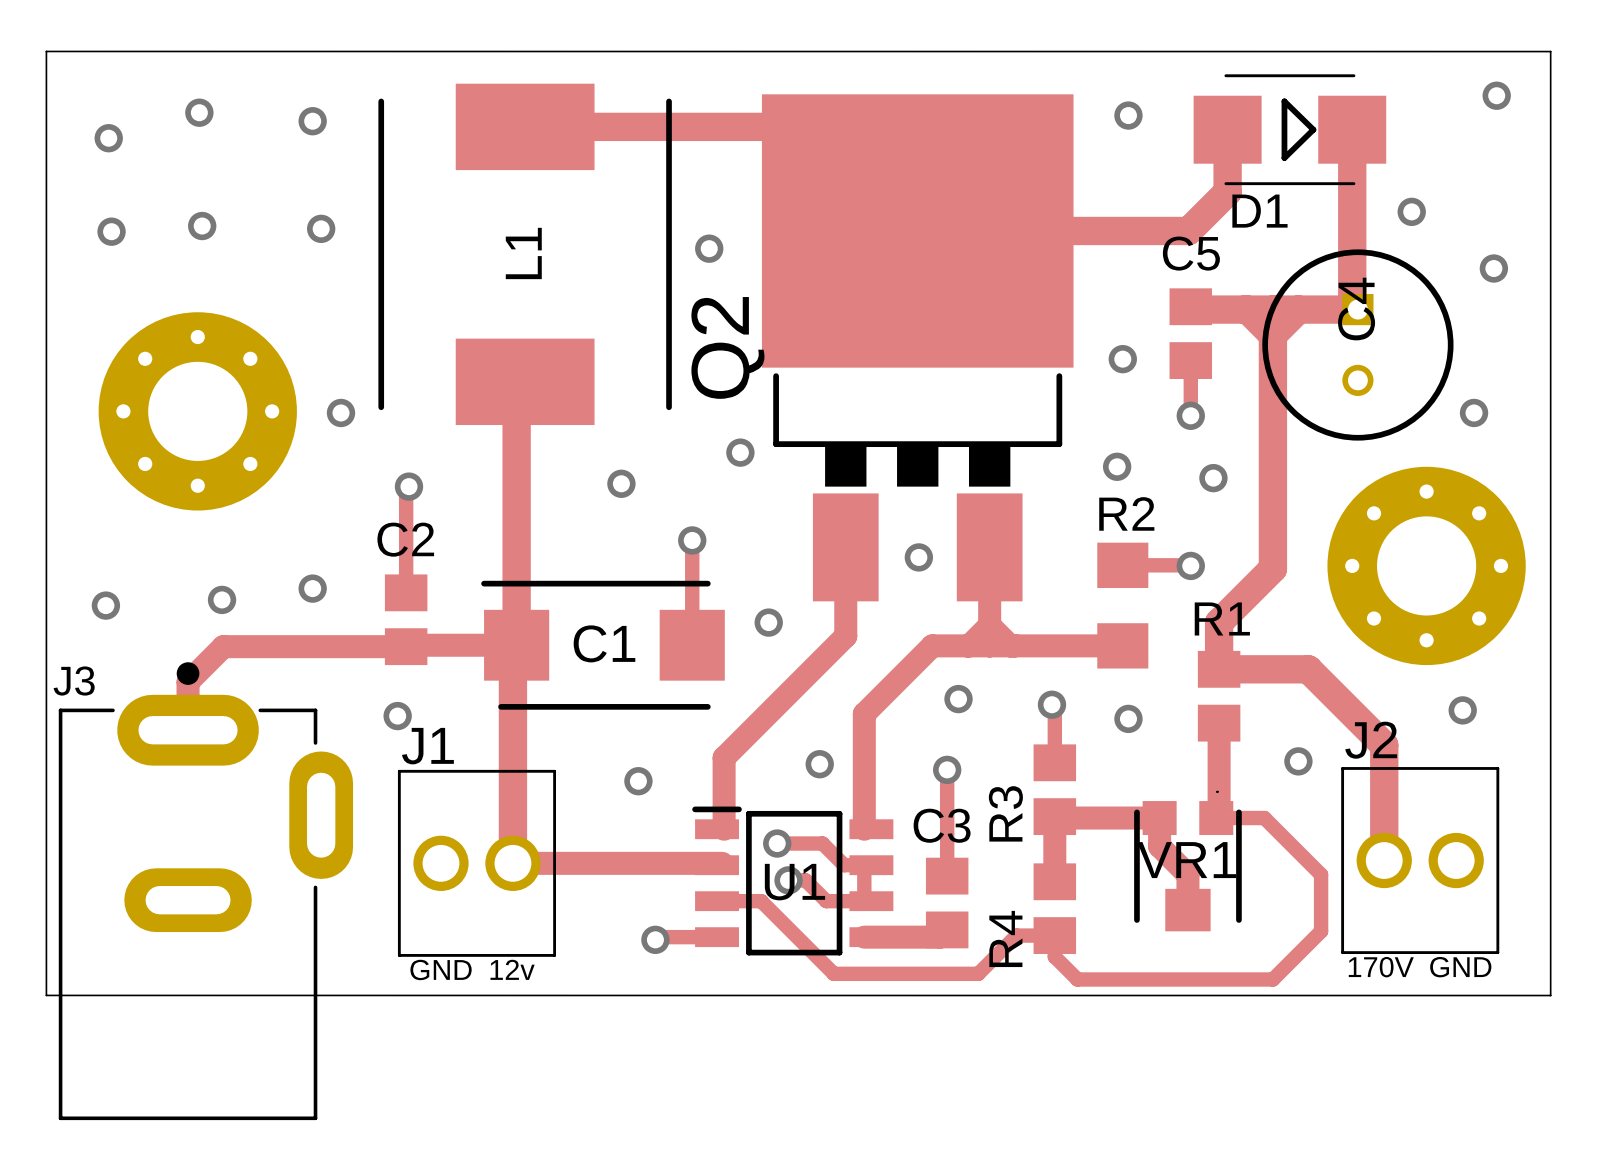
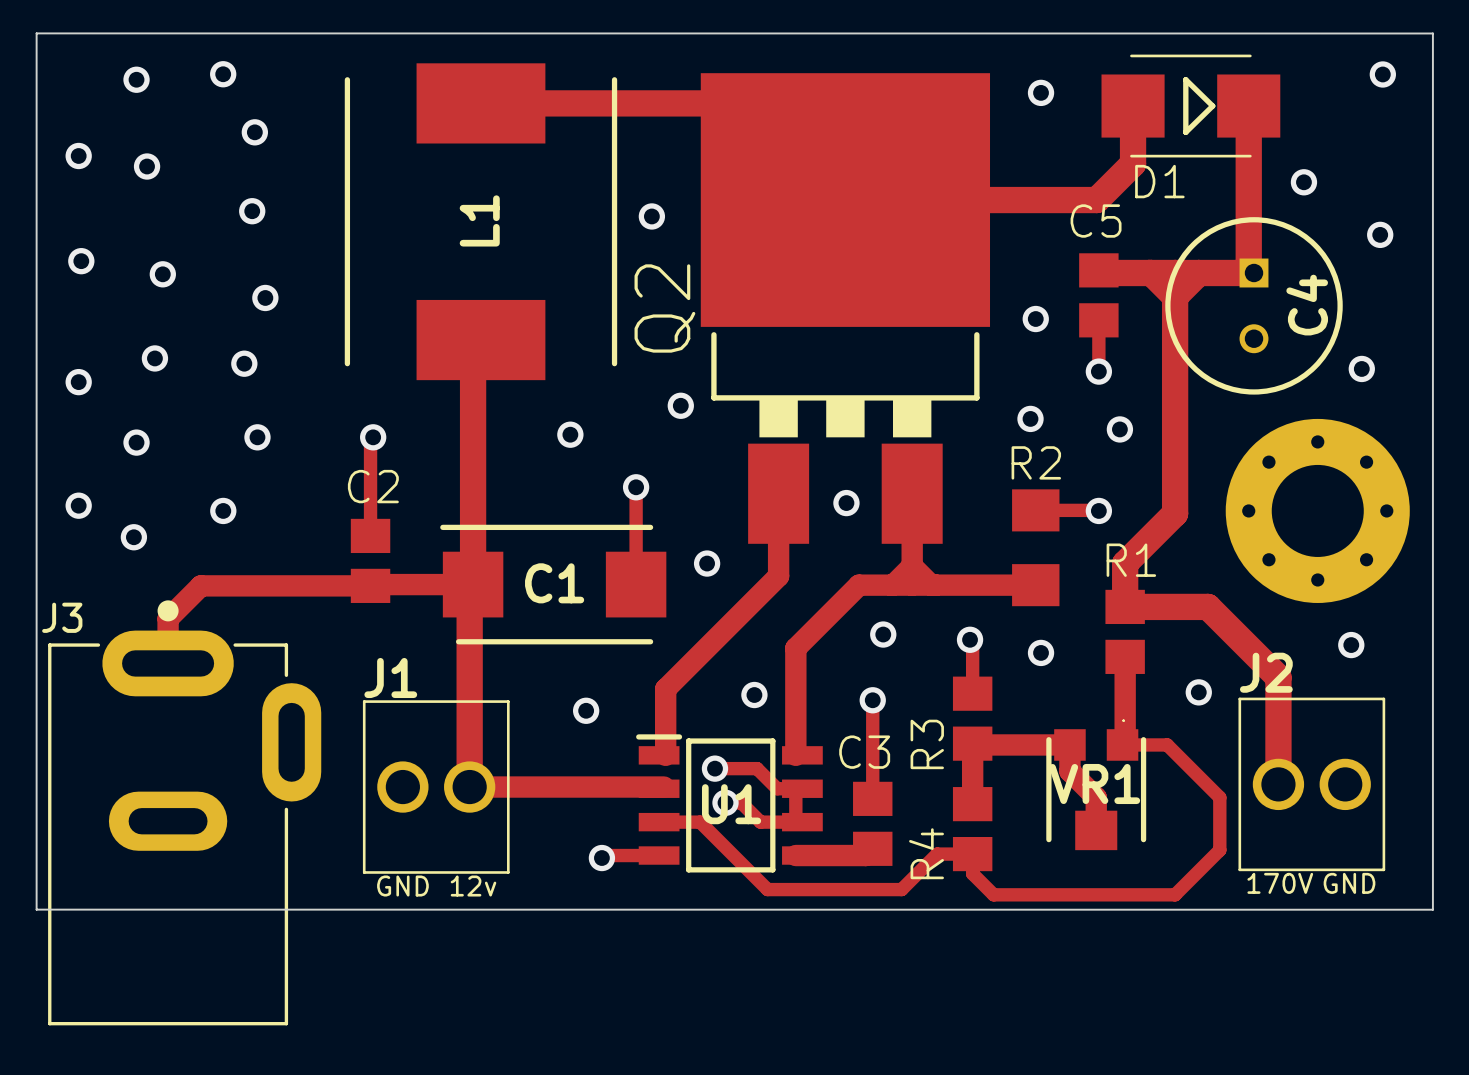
via: none -> (223, 74)
via: none -> (136, 79)
via: (199, 112) -> none
via: (312, 121) -> none
via: (108, 138) -> none
via: none -> (254, 132)
via: none -> (78, 155)
via: none -> (147, 166)
via: (202, 226) -> none
via: (321, 228) -> none
via: (111, 231) -> none
via: none -> (252, 211)
via: none -> (81, 261)
C4 name position: C4 (1356, 309) -> C4 (1307, 305)
via: none -> (162, 274)
via: none -> (265, 297)
via: none -> (154, 358)
via: none -> (244, 363)
part: (197, 411) -> none
via: (341, 412) -> none
via: none -> (78, 382)
via: none -> (257, 437)
via: none -> (136, 442)
via: none -> (78, 505)
via: none -> (223, 510)
via: (312, 588) -> none
via: none -> (133, 537)
via: (222, 599) -> none
via: (105, 605) -> none
via: (397, 716) -> none

